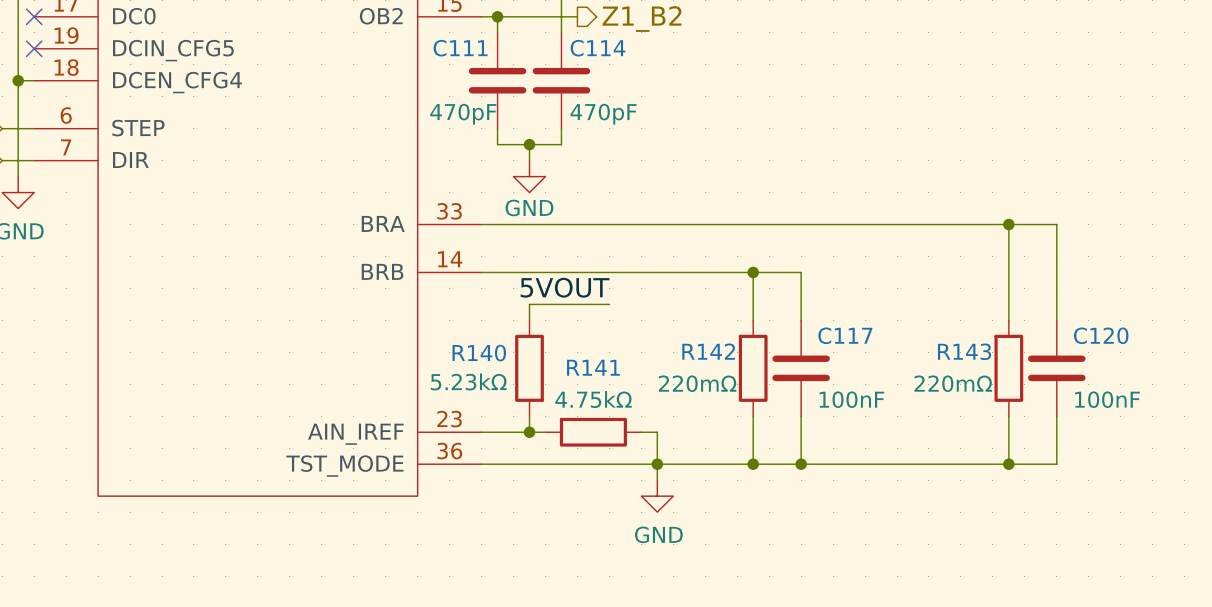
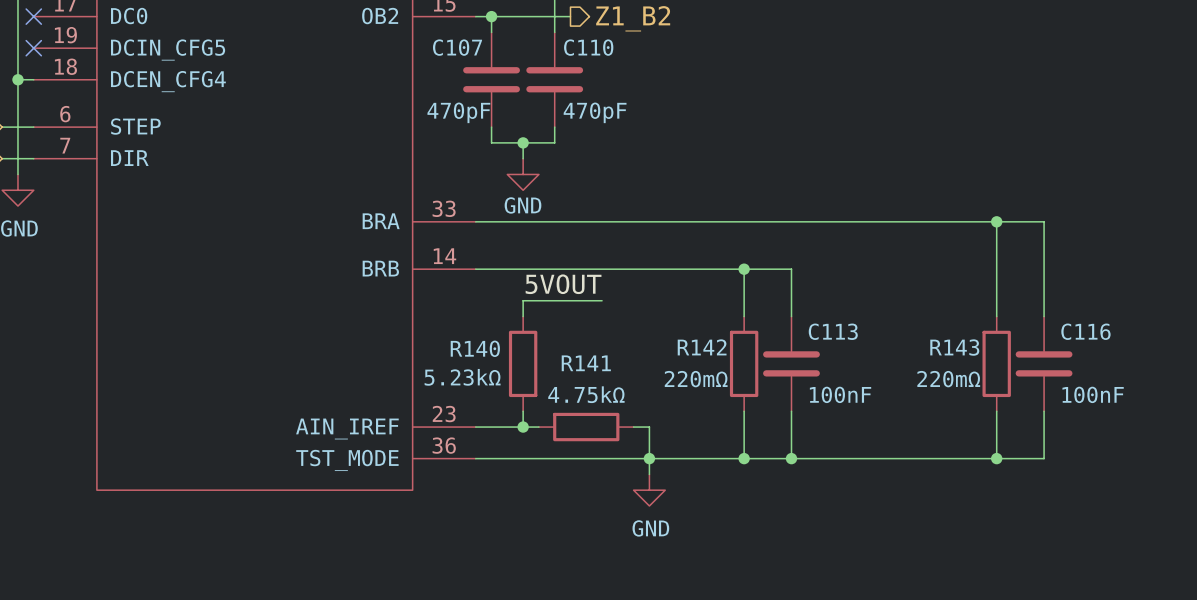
C111 name: C111 (460, 48) -> C107 (457, 47)
C114 name: C114 (598, 48) -> C110 (588, 47)
C117 name: C117 (845, 335) -> C113 (833, 331)
C120 name: C120 (1101, 335) -> C116 (1085, 331)

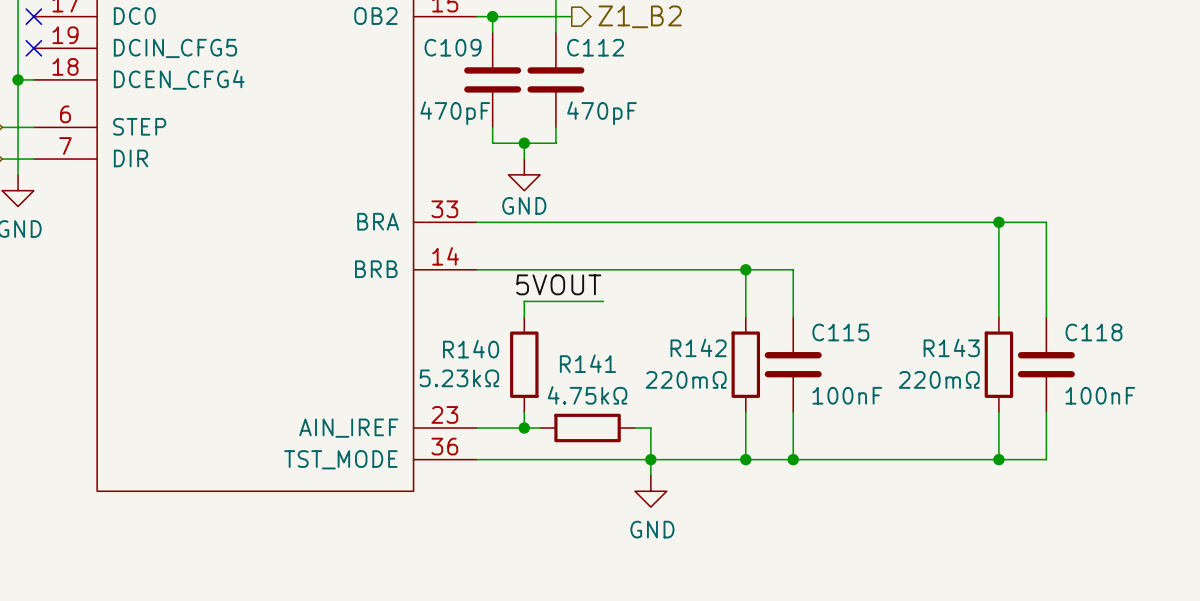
C107 name: C107 (457, 47) -> C109 (452, 47)
C110 name: C110 (588, 47) -> C112 (595, 47)
C113 name: C113 (833, 331) -> C115 (840, 332)
C116 name: C116 (1085, 331) -> C118 (1093, 332)

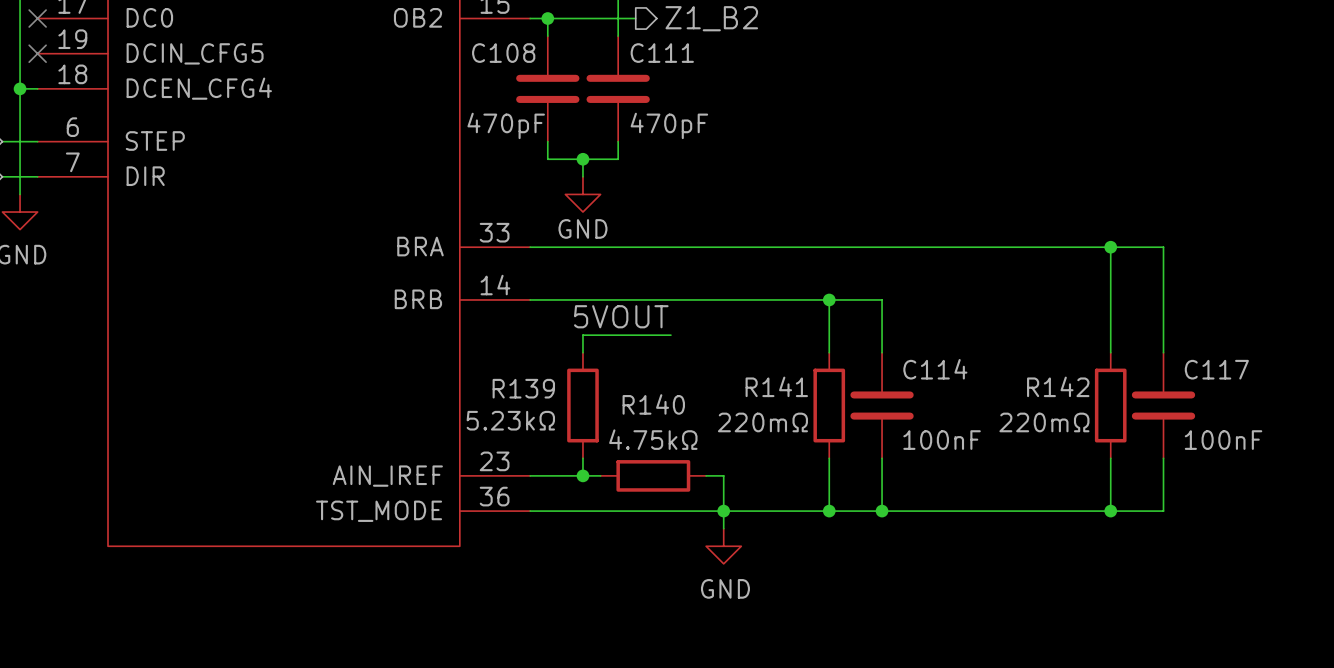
C109 name: C109 (452, 47) -> C108 (503, 53)
C112 name: C112 (595, 47) -> C111 (662, 53)
C115 name: C115 (840, 332) -> C114 (935, 369)
C118 name: C118 (1093, 332) -> C117 (1216, 369)
R142 name: R142 (698, 347) -> R141 (776, 386)
R143 name: R143 (951, 347) -> R142 (1058, 386)
R140 name: R140 (471, 349) -> R139 (523, 388)
R141 name: R141 (587, 363) -> R140 (653, 404)

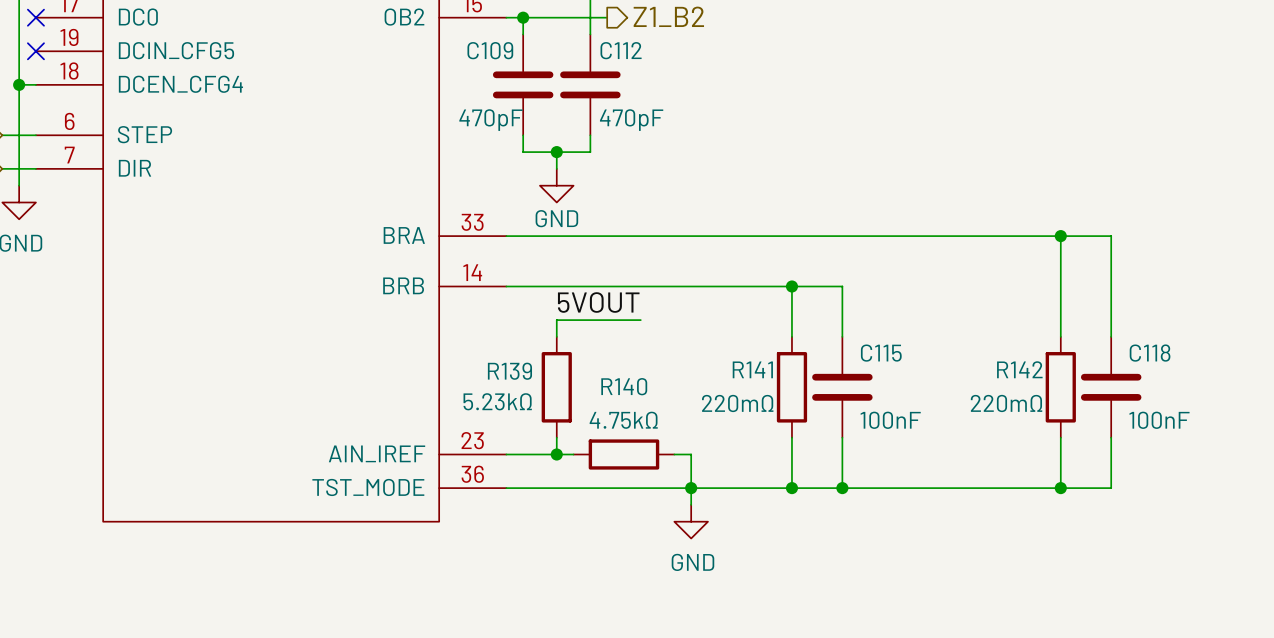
C108 name: C108 (503, 53) -> C109 (490, 50)
C111 name: C111 (662, 53) -> C112 (621, 50)
C114 name: C114 (935, 369) -> C115 (881, 353)
C117 name: C117 (1216, 369) -> C118 (1150, 353)

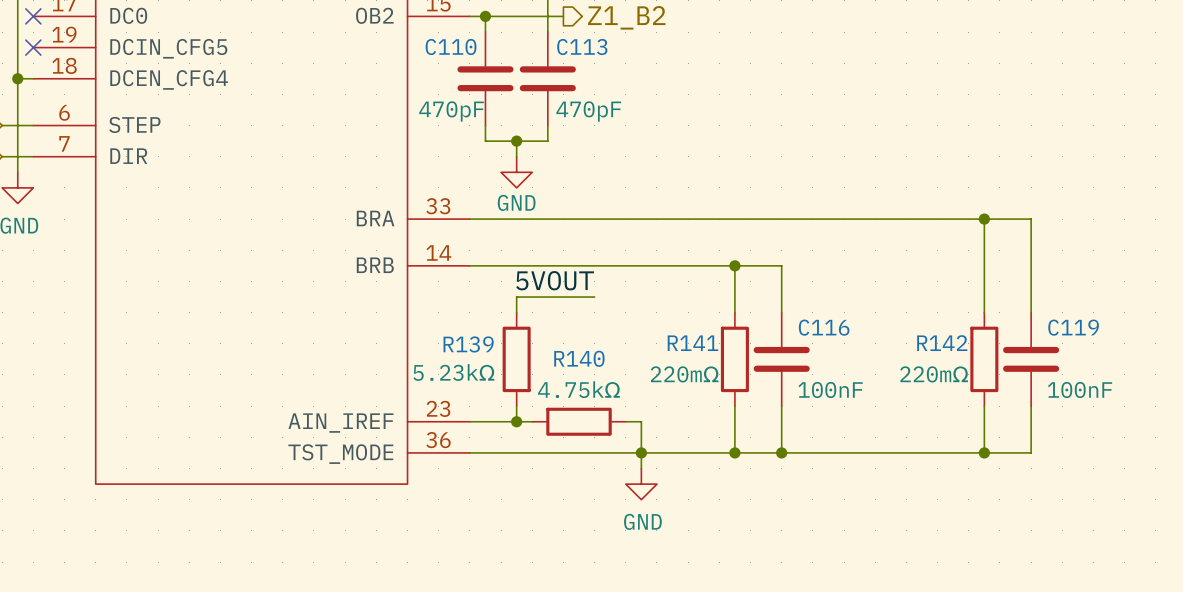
C109 name: C109 (490, 50) -> C110 (451, 47)
C112 name: C112 (621, 50) -> C113 (582, 47)
C115 name: C115 (881, 353) -> C116 (824, 327)
C118 name: C118 (1150, 353) -> C119 (1073, 327)

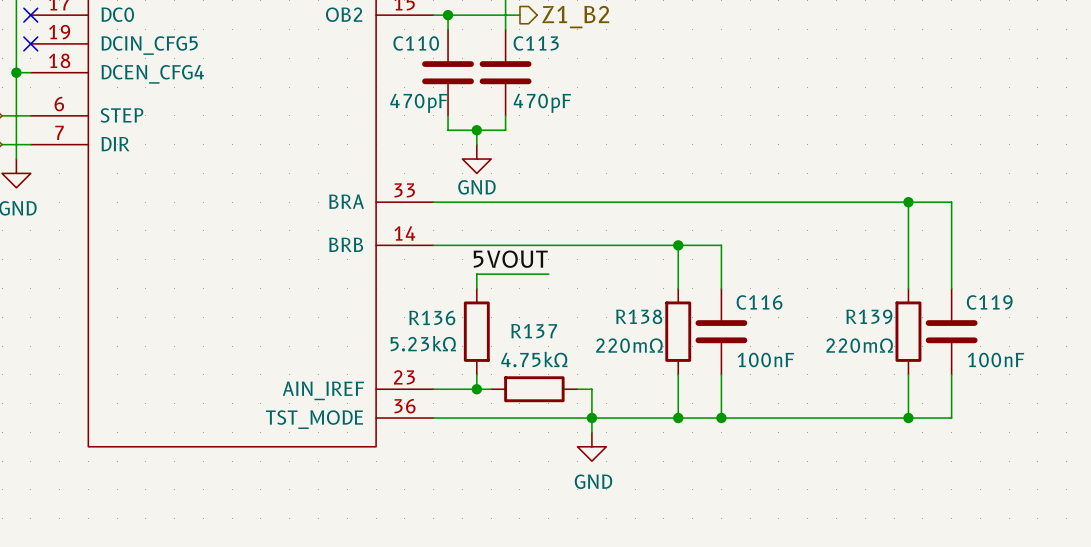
R141 name: R141 (693, 343) -> R138 (639, 316)
R142 name: R142 (942, 343) -> R139 (869, 316)
R139 name: R139 (468, 344) -> R136 (432, 317)
R140 name: R140 (579, 358) -> R137 (534, 331)

